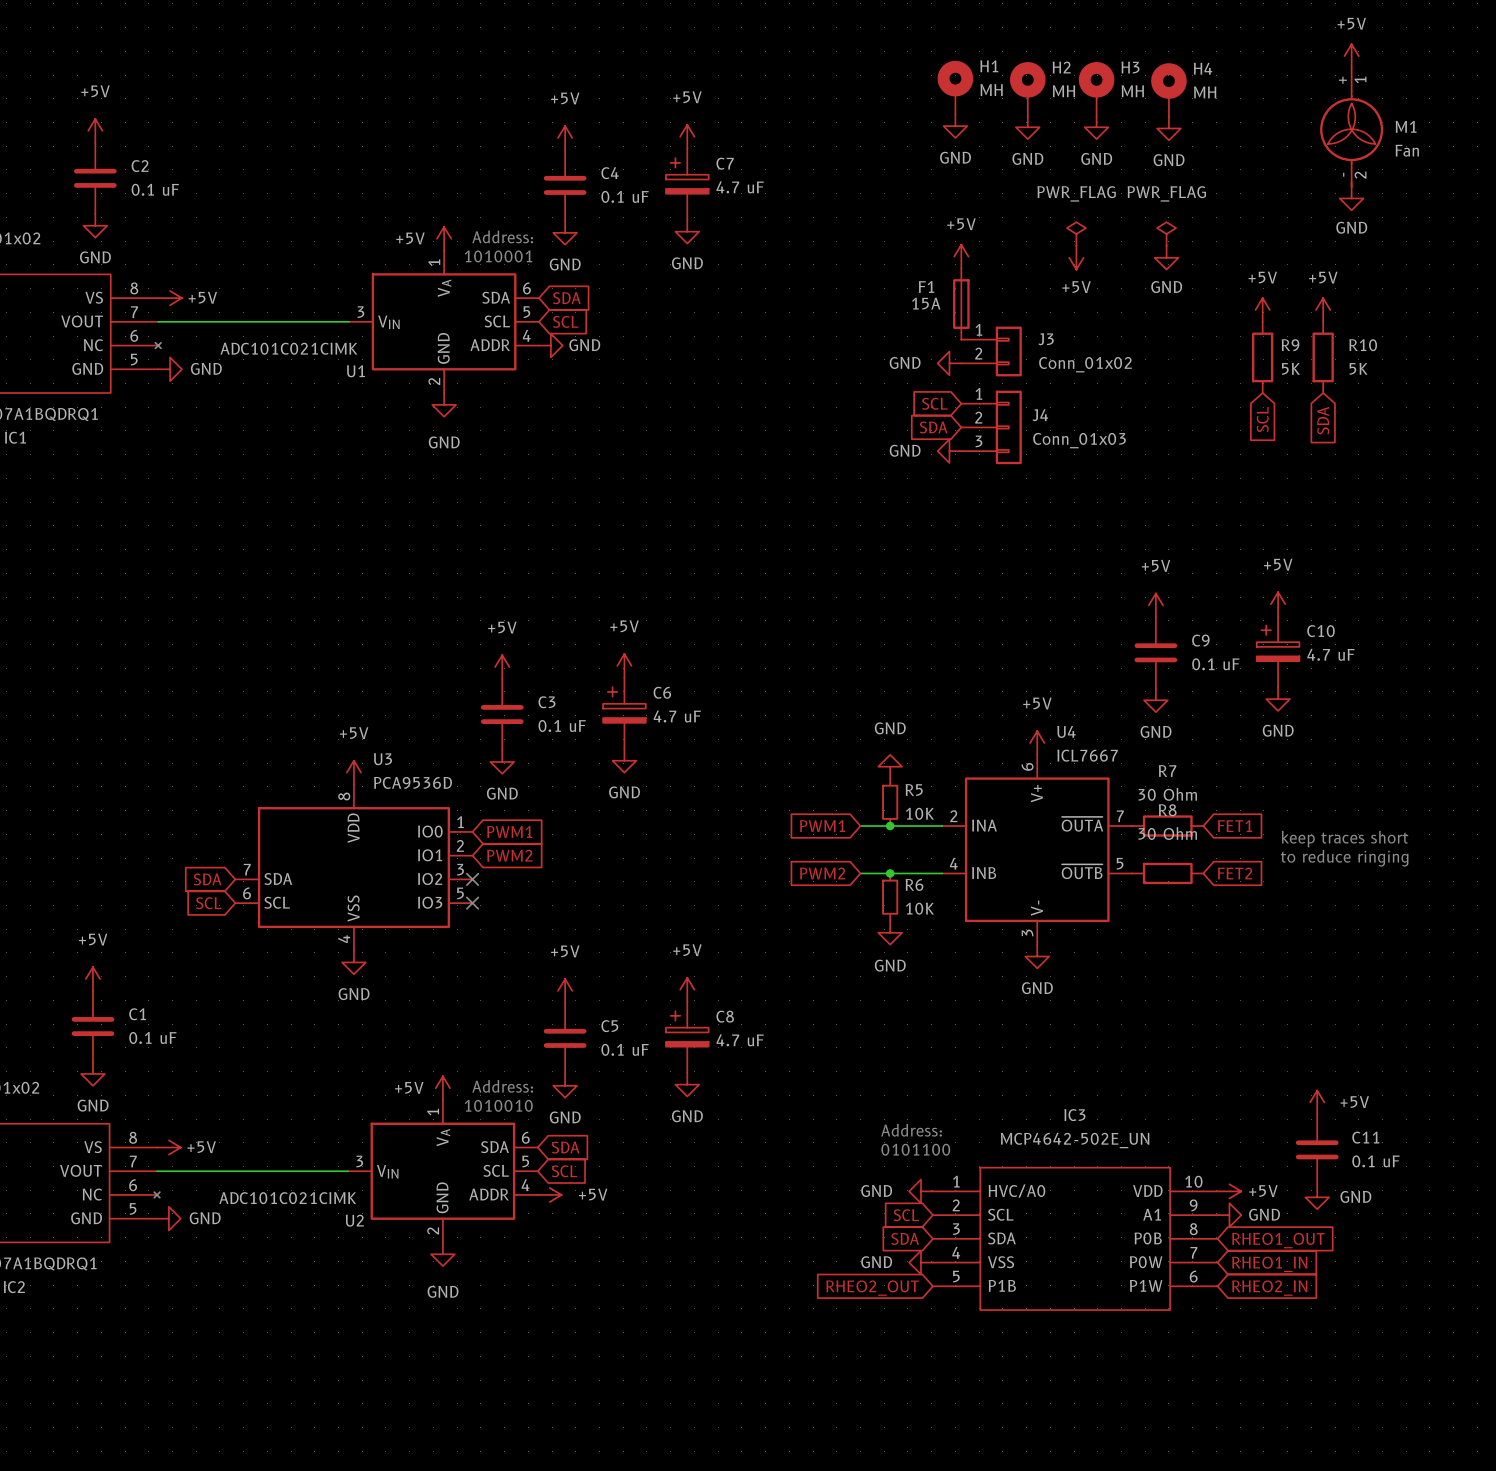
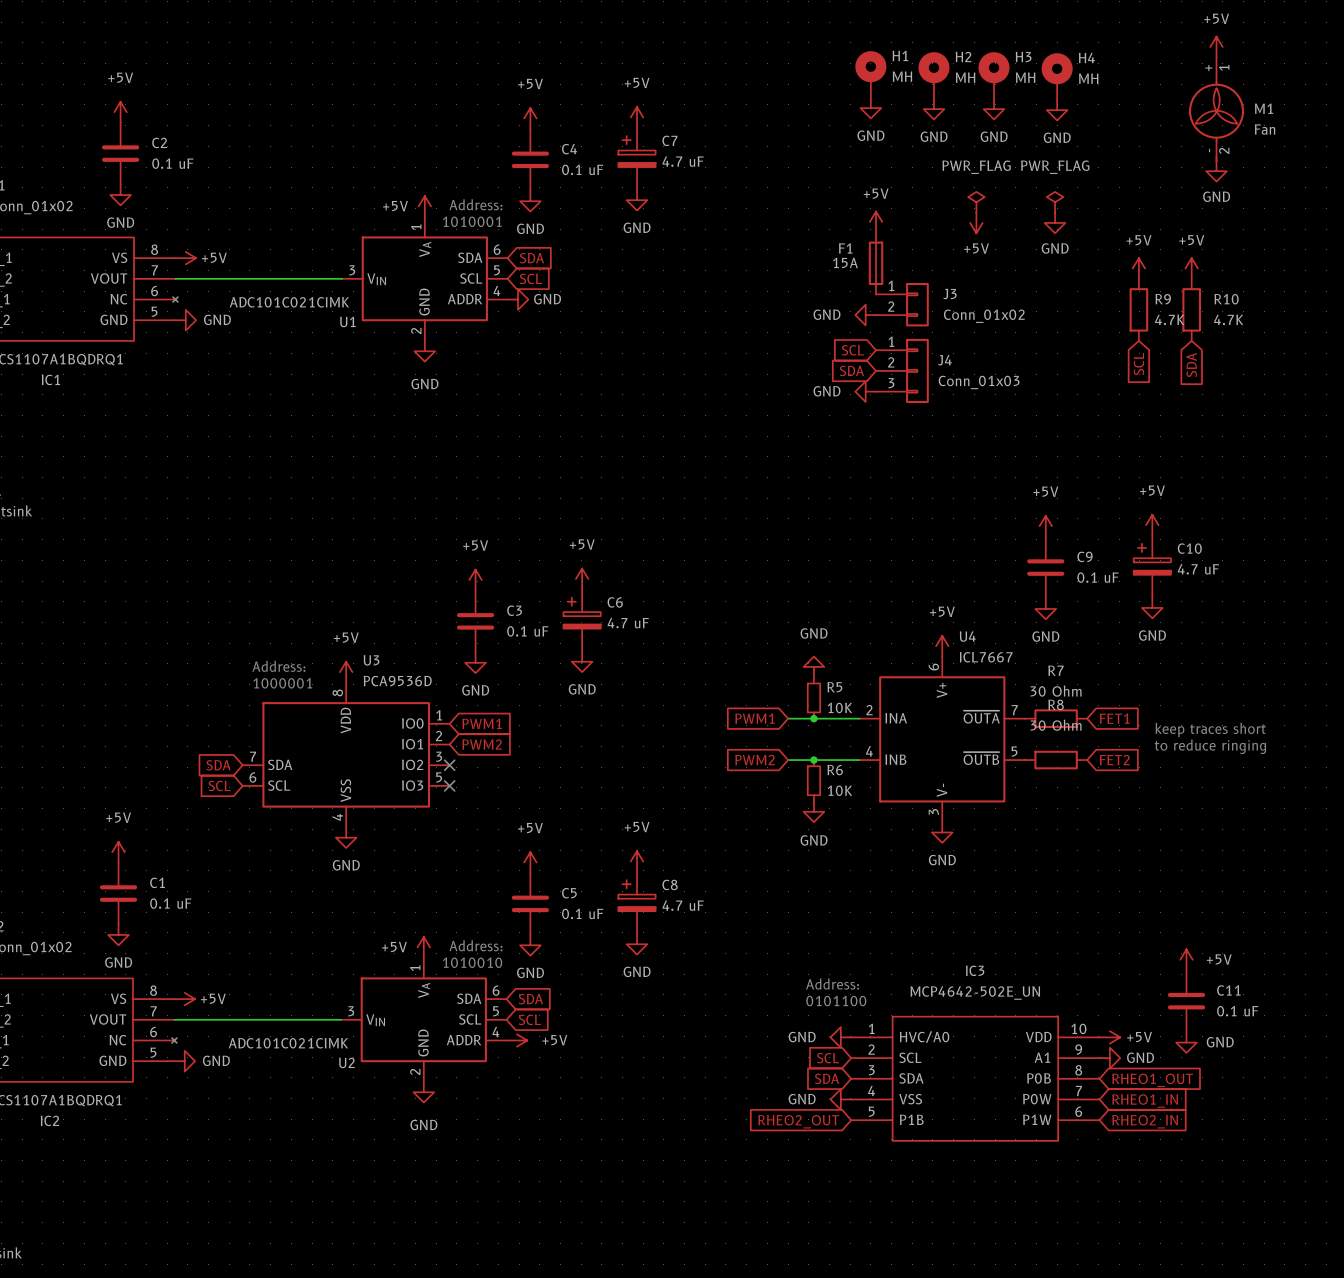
R9 value: 5K (1290, 368) -> 4.7K (1169, 319)
R10 value: 5K (1358, 368) -> 4.7K (1228, 319)
text: none -> Address: (278, 666)
text: none -> 1000001 (282, 683)

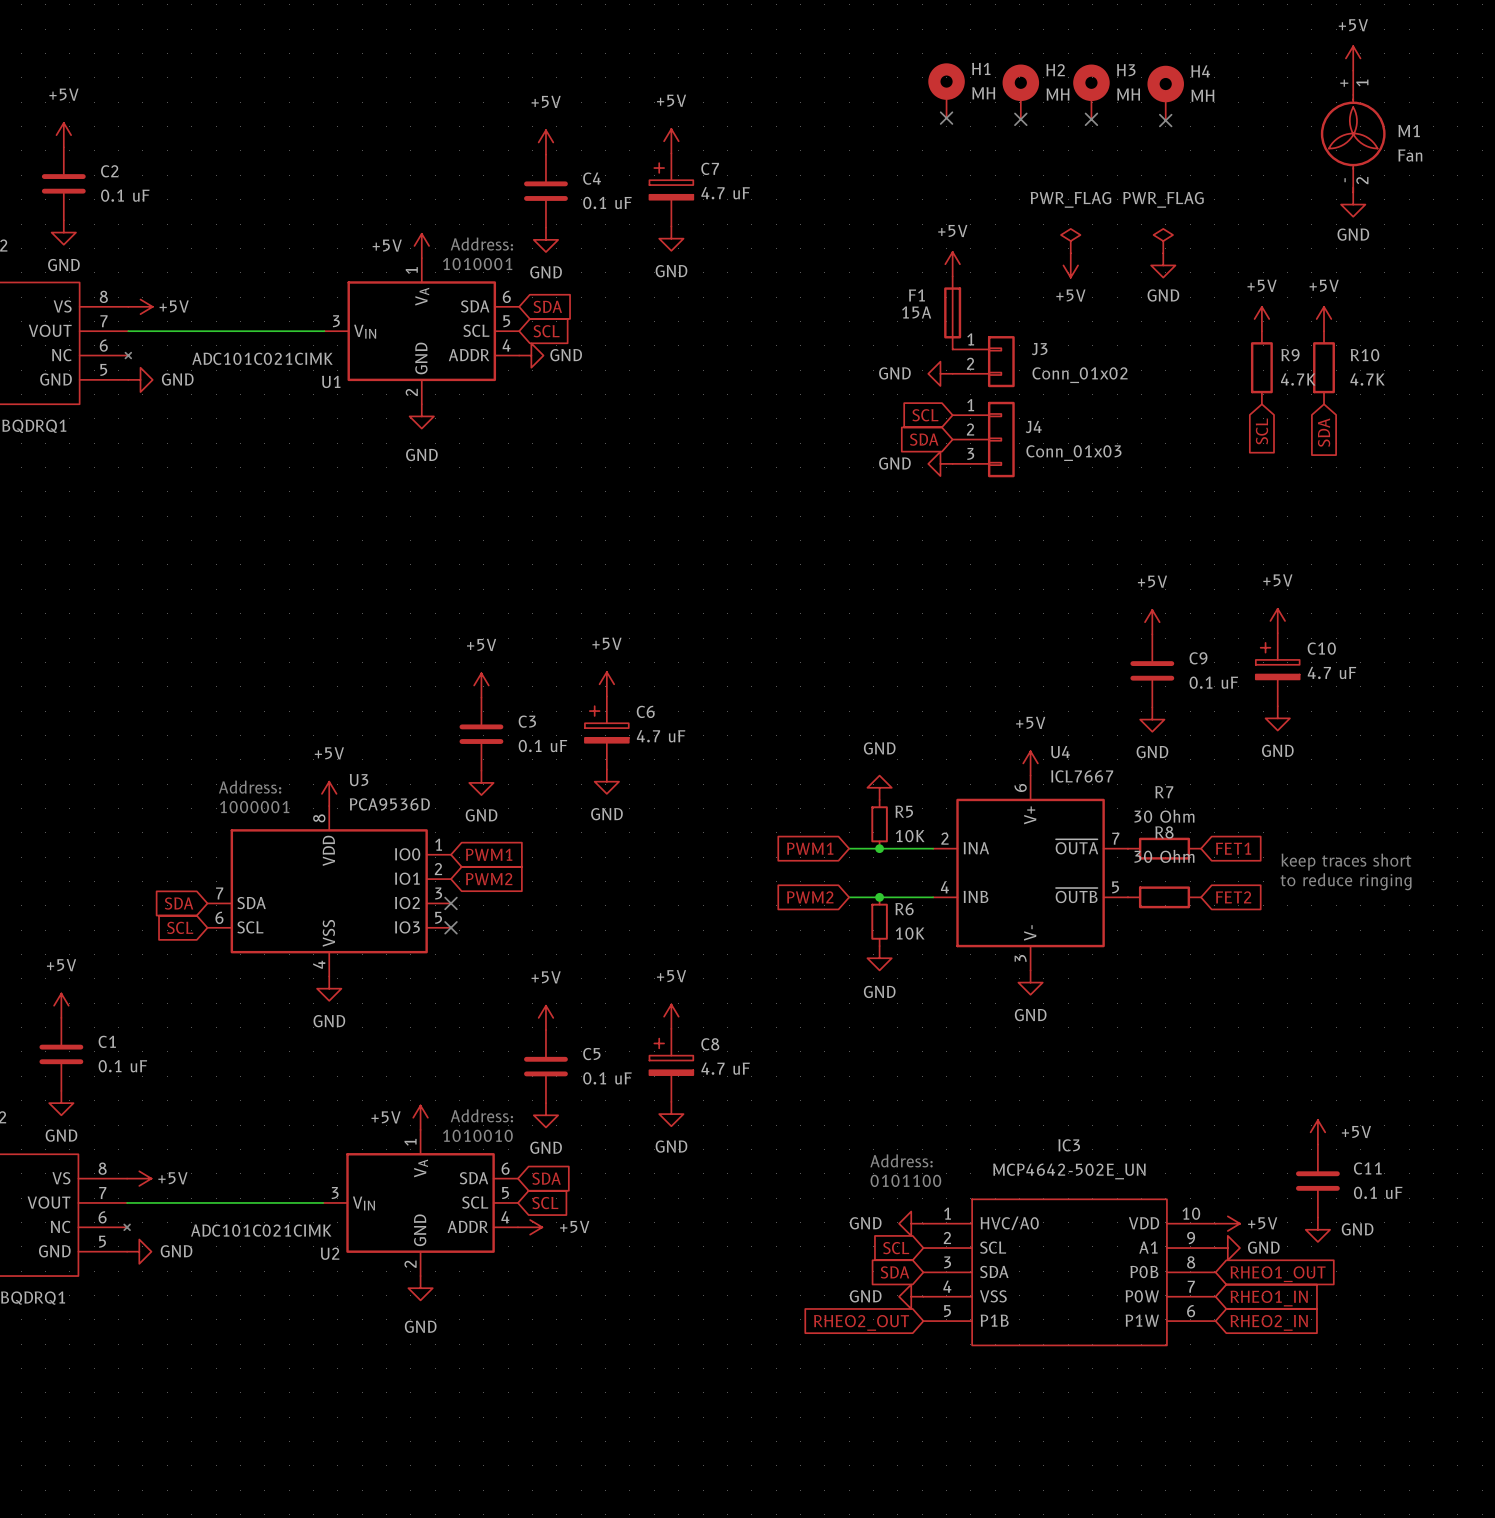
no-connect mark: none -> (946, 118)
no-connect mark: none -> (1020, 119)
no-connect mark: none -> (1091, 119)
no-connect mark: none -> (1165, 120)
power symbol: GND (870, 108) -> none
power symbol: GND (933, 109) -> none
power symbol: GND (994, 109) -> none
power symbol: GND (1057, 110) -> none

